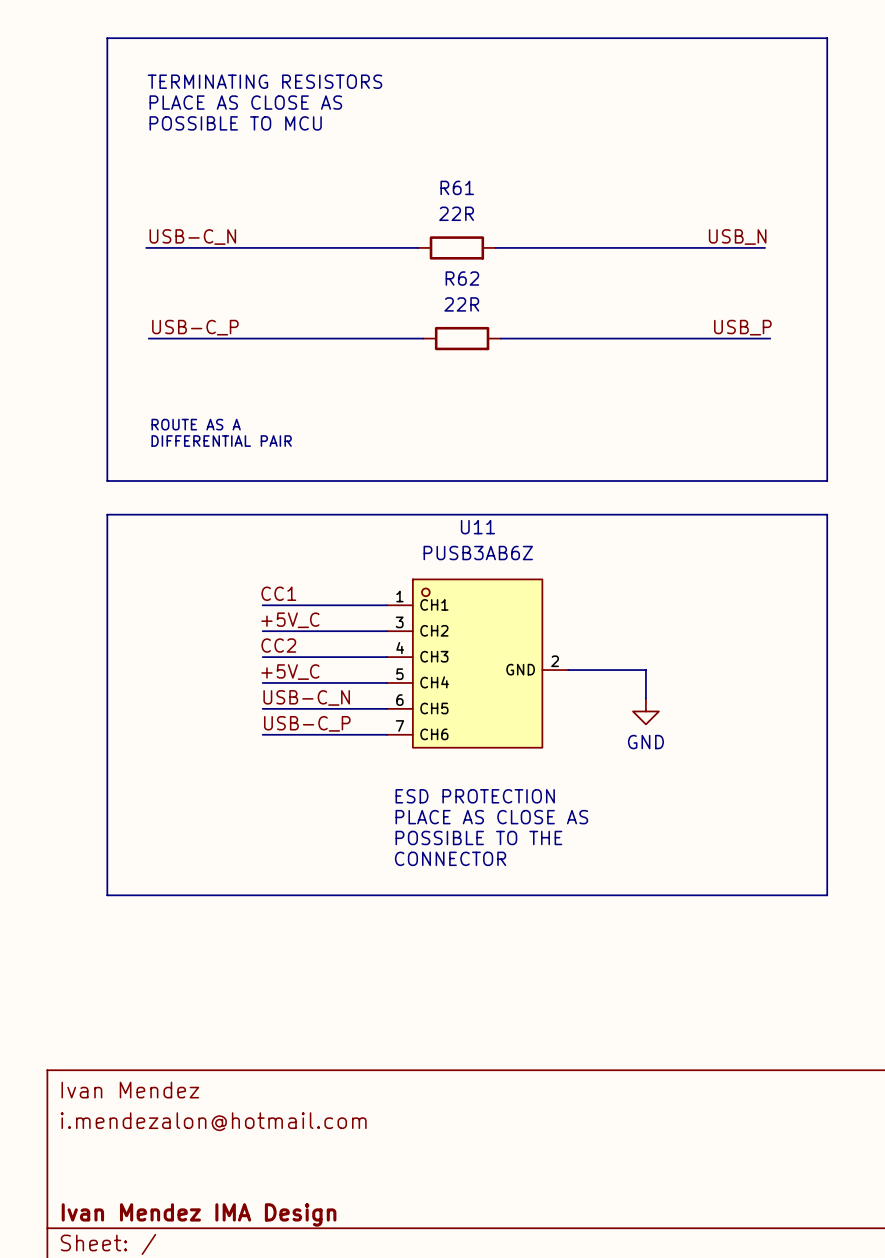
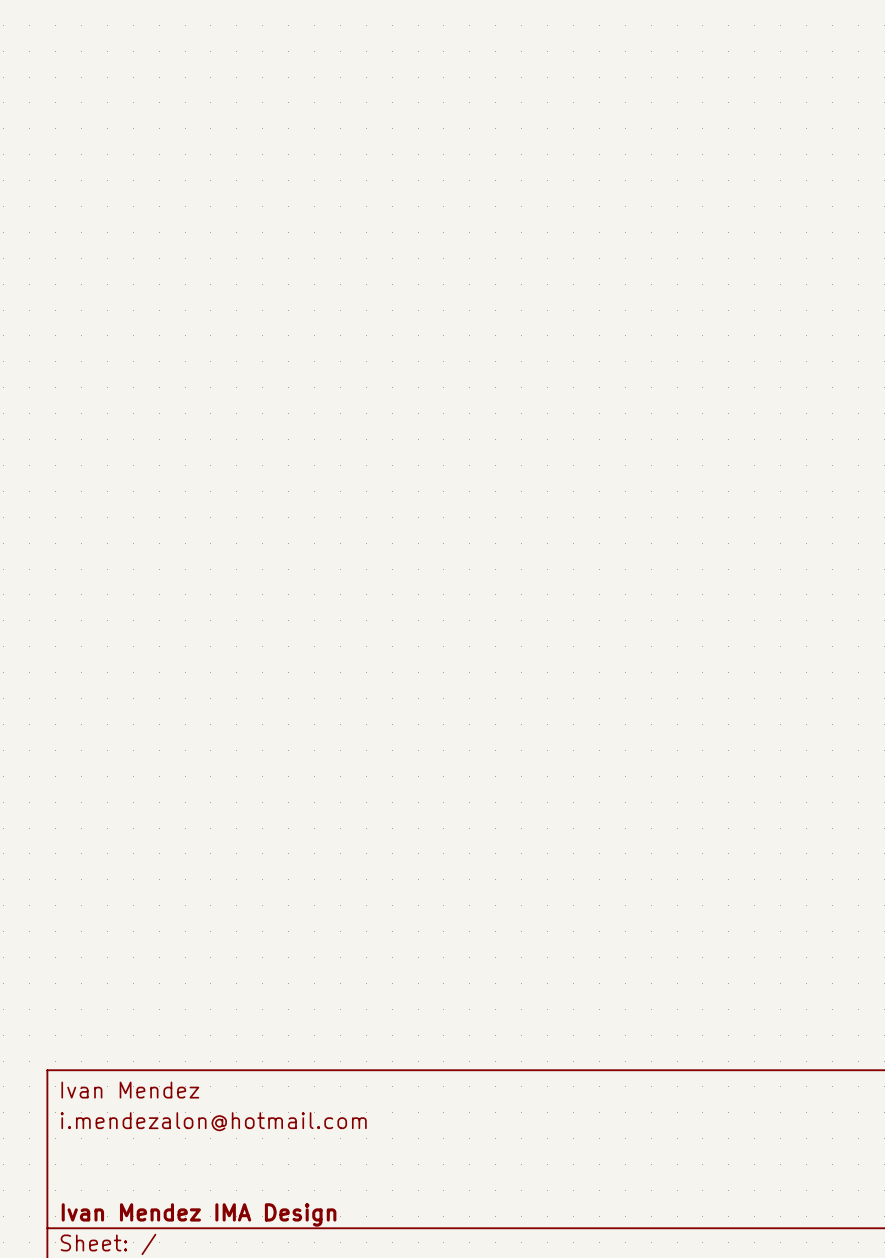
line: (107, 38) (827, 38) (827, 481) (107, 481) (107, 38) -> none
text: TERMINATING RESISTORS (264, 81) -> none
text: PLACE AS CLOSE AS (245, 102) -> none
text: POSSIBLE TO MCU (235, 123) -> none
label: USB-C_N (192, 237) -> none
label: USB_N (737, 237) -> none
wire: (146, 247) (418, 247) -> none
R61: 22R (456, 247) -> none
wire: (495, 247) (765, 247) -> none
label: USB-C_P (195, 327) -> none
label: USB_P (742, 327) -> none
wire: (148, 338) (423, 338) -> none
R62: 22R (462, 338) -> none
wire: (500, 338) (770, 338) -> none
text: ROUTE AS A (196, 424) -> none
text: DIFFERENTIAL PAIR (221, 441) -> none
line: (107, 514) (107, 895) (827, 895) (827, 514) (107, 514) -> none
label: CC1 (278, 593) -> none
wire: (262, 605) (387, 605) -> none
label: +5V_C (290, 620) -> none
wire: (262, 631) (387, 631) -> none
label: CC2 (278, 645) -> none
wire: (262, 657) (387, 657) -> none
U11: PUSB3AB6Z (477, 663) -> none
wire: (568, 670) (645, 670) (645, 698) -> none
label: +5V_C (290, 672) -> none
wire: (262, 682) (387, 682) -> none
label: USB-C_N (306, 697) -> none
wire: (262, 708) (387, 708) -> none
power symbol: GND (645, 711) -> none
label: USB-C_P (307, 723) -> none
wire: (262, 734) (387, 734) -> none
text: ESD PROTECTION (475, 796) -> none
text: PLACE AS CLOSE AS (491, 817) -> none
text: POSSIBLE TO THE (478, 837) -> none
text: CONNECTOR (450, 858) -> none

